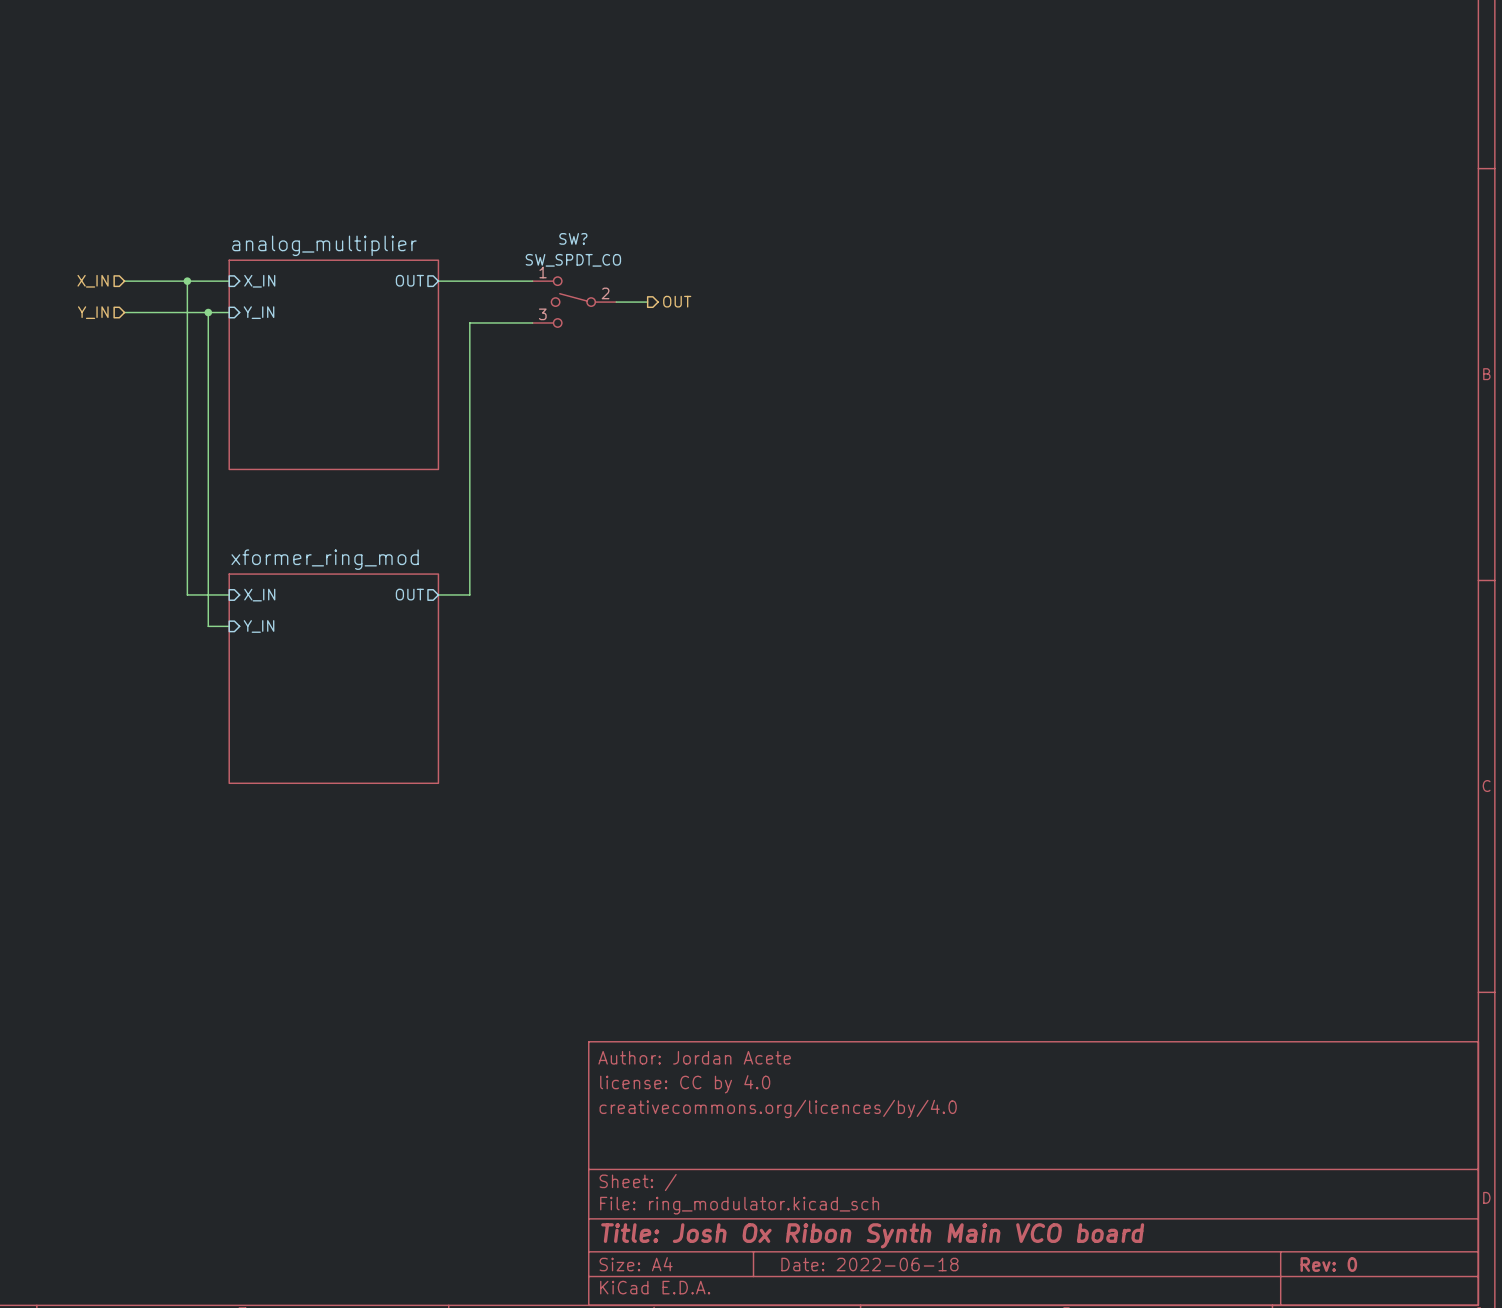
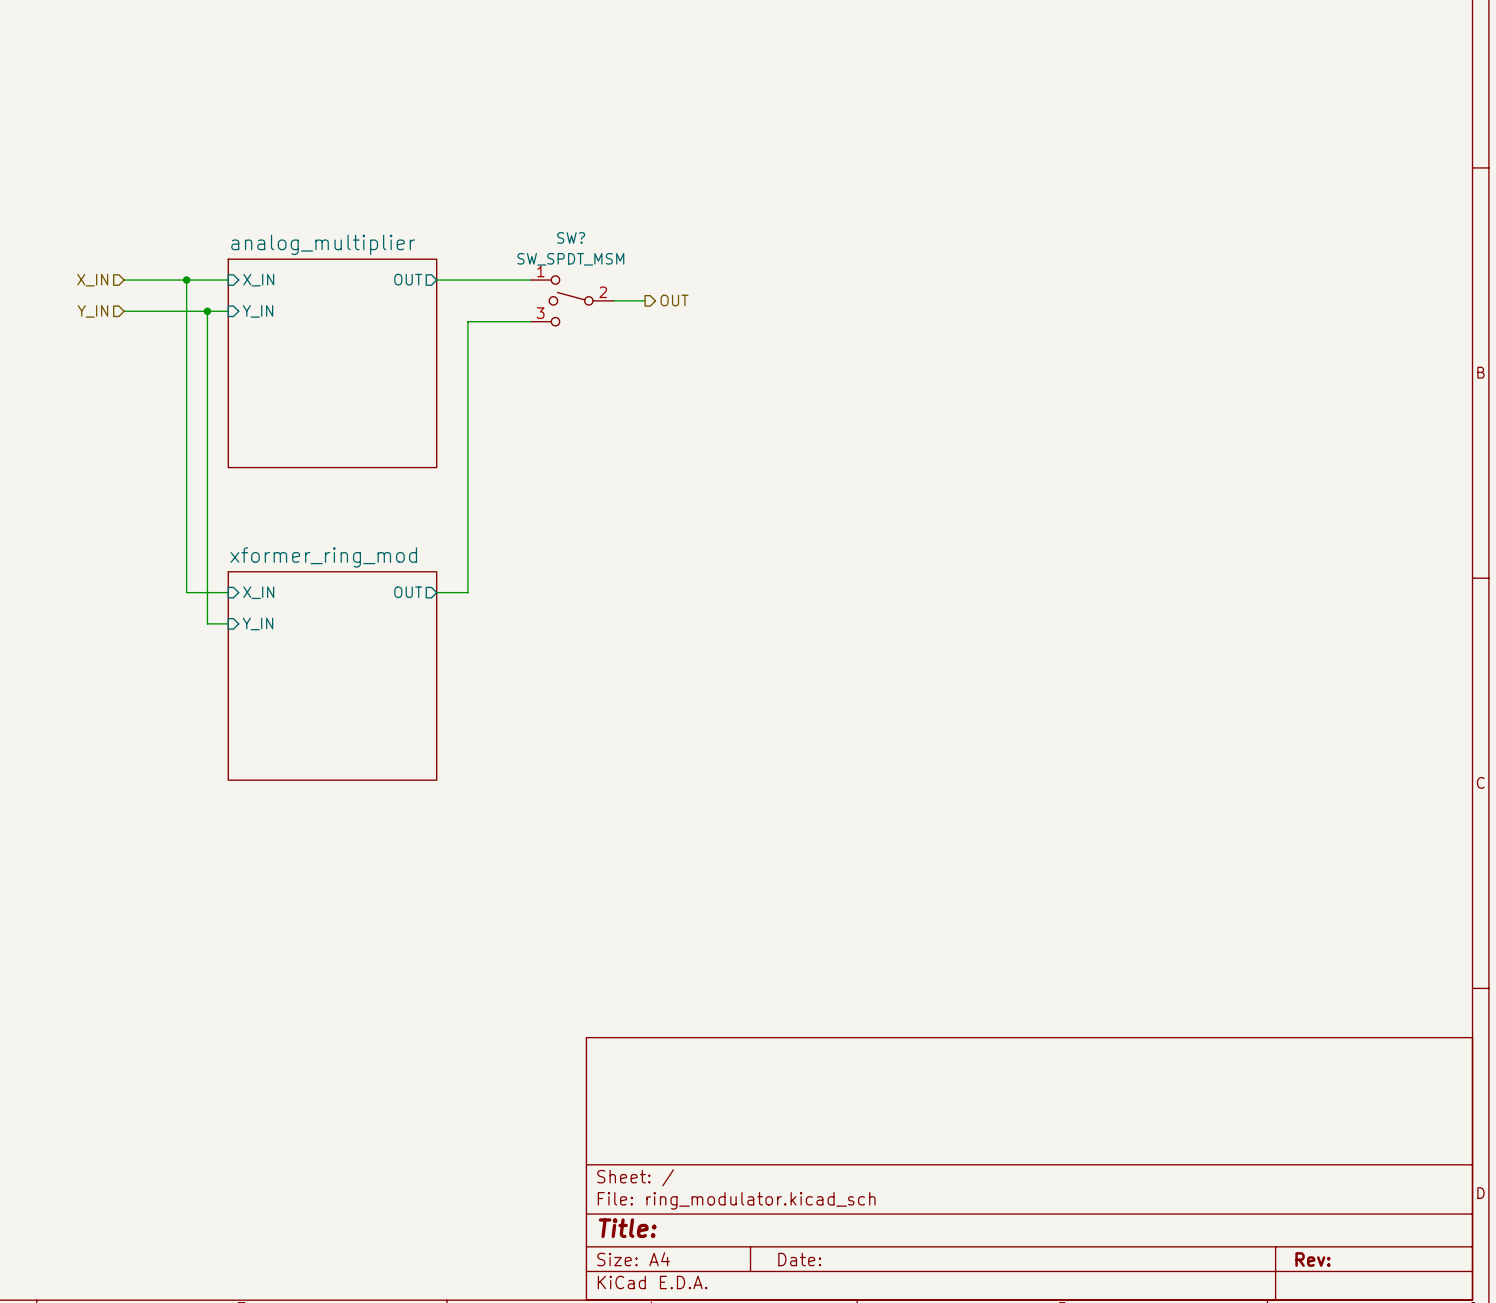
SW? value: SW_SPDT_CO (573, 260) -> SW_SPDT_MSM (570, 259)
title block: Author: Jordan Acete (694, 1057) -> none
title block: license: CC by 4.0 (685, 1084) -> none
title block: creativecommons.org/licences/by/4.0 (778, 1108) -> none
title block: Title: Josh Ox Ribon Synth Main VCO board (872, 1235) -> Title: (627, 1228)
title block: Date: 2022-06-18 (869, 1264) -> Date: (799, 1259)
title block: Rev: 0 (1328, 1264) -> Rev: (1312, 1259)

